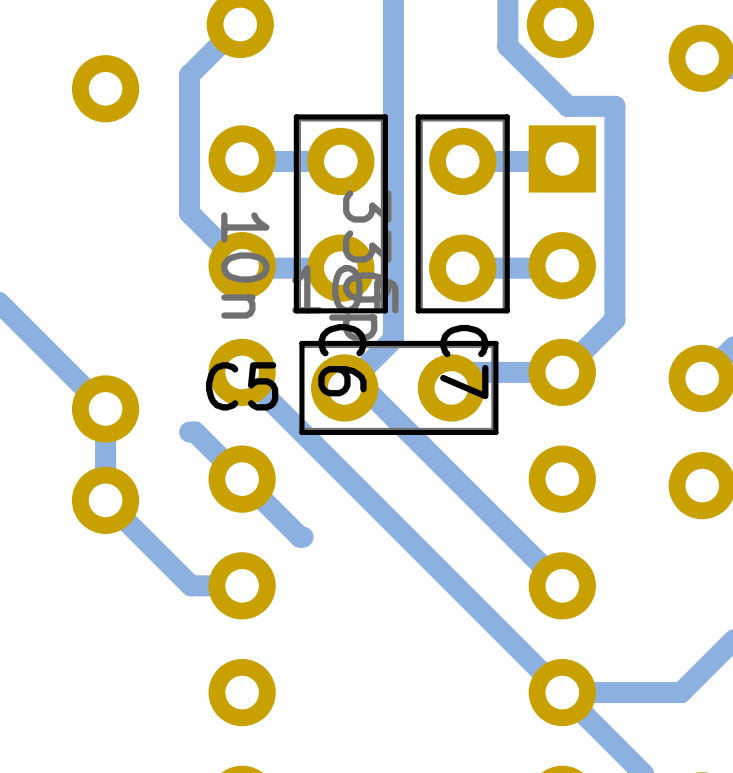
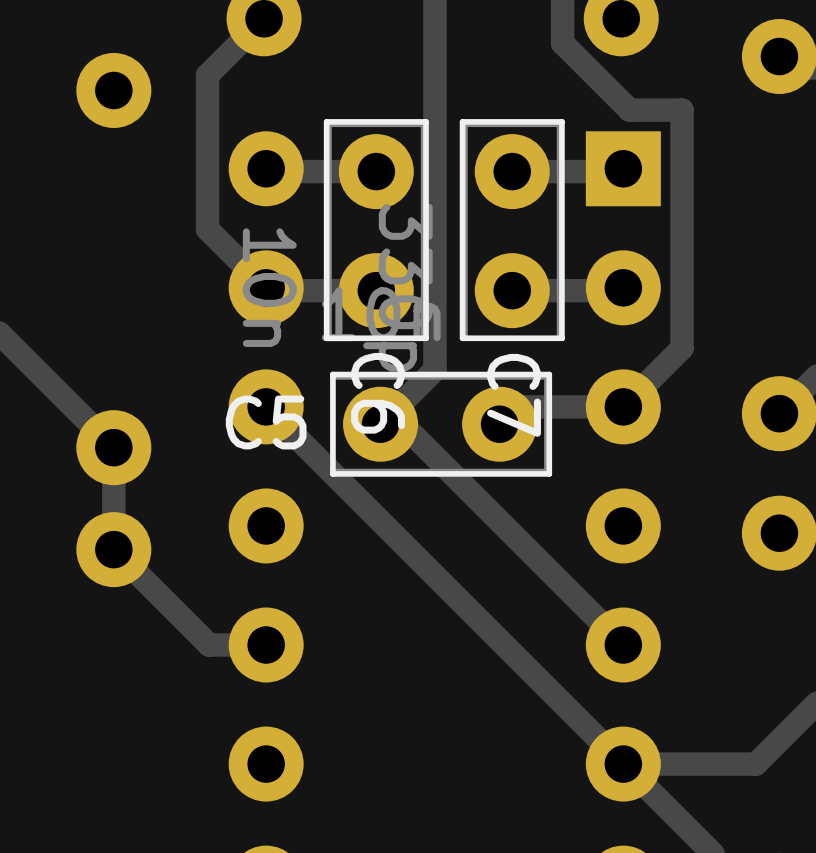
track: (189, 432) (195, 432) (300, 537) (303, 537) -> none

